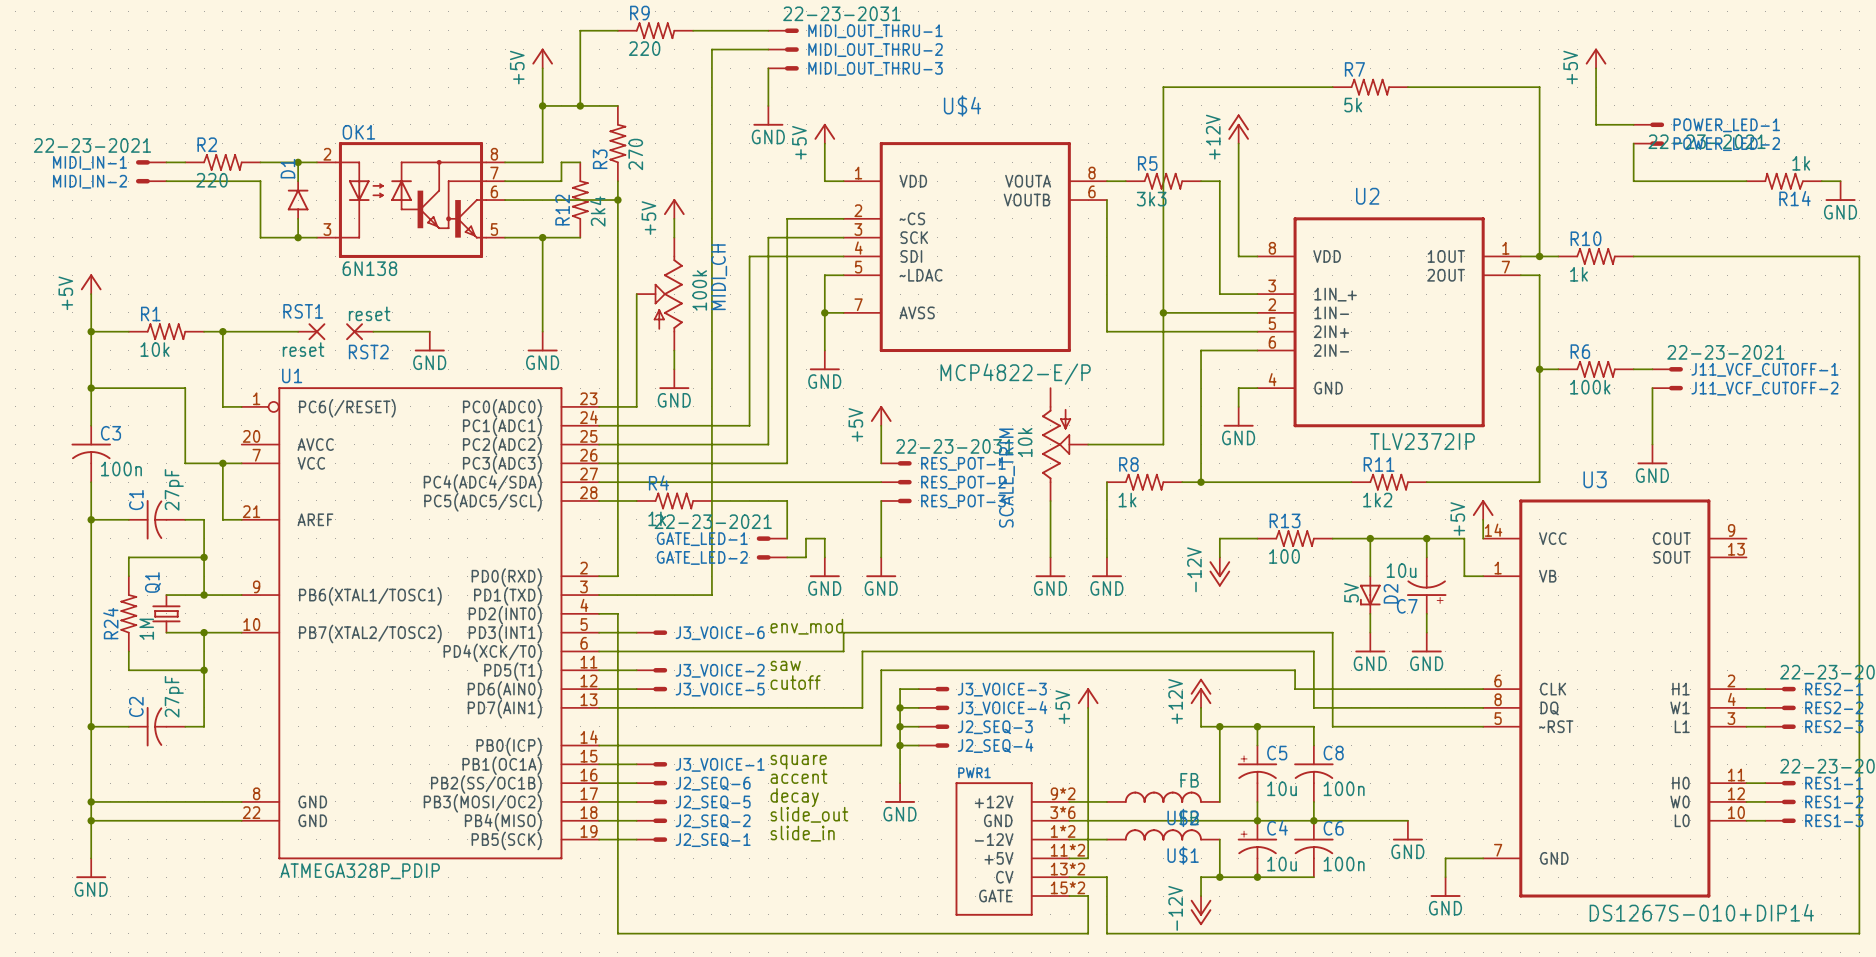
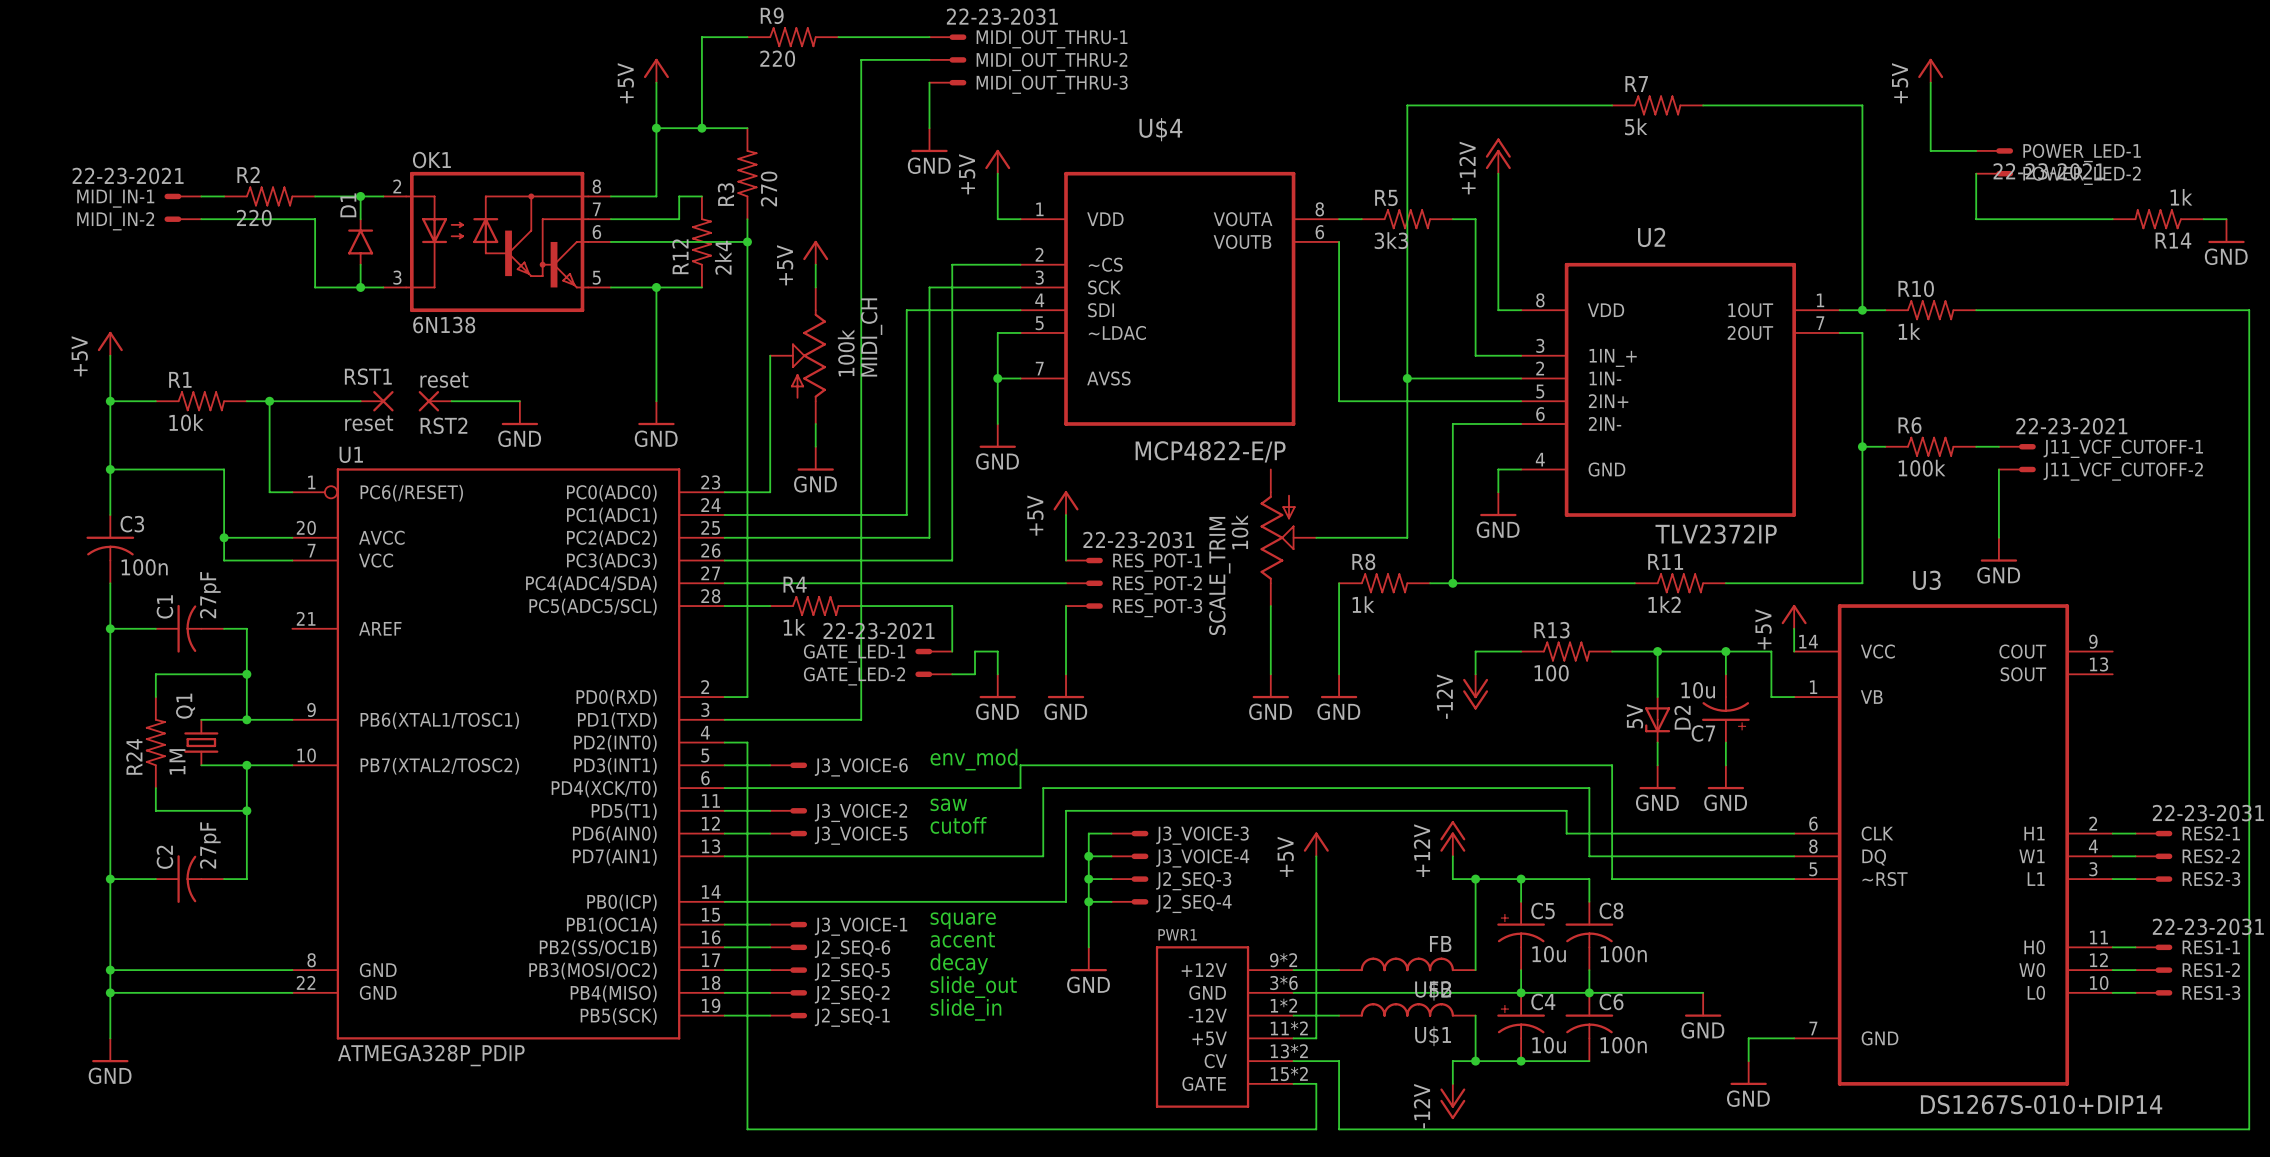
wire: none -> (224, 537) (292, 537)
wire: (222, 463) (222, 519) (241, 519) -> none
junction position: (222, 463) -> (224, 537)

